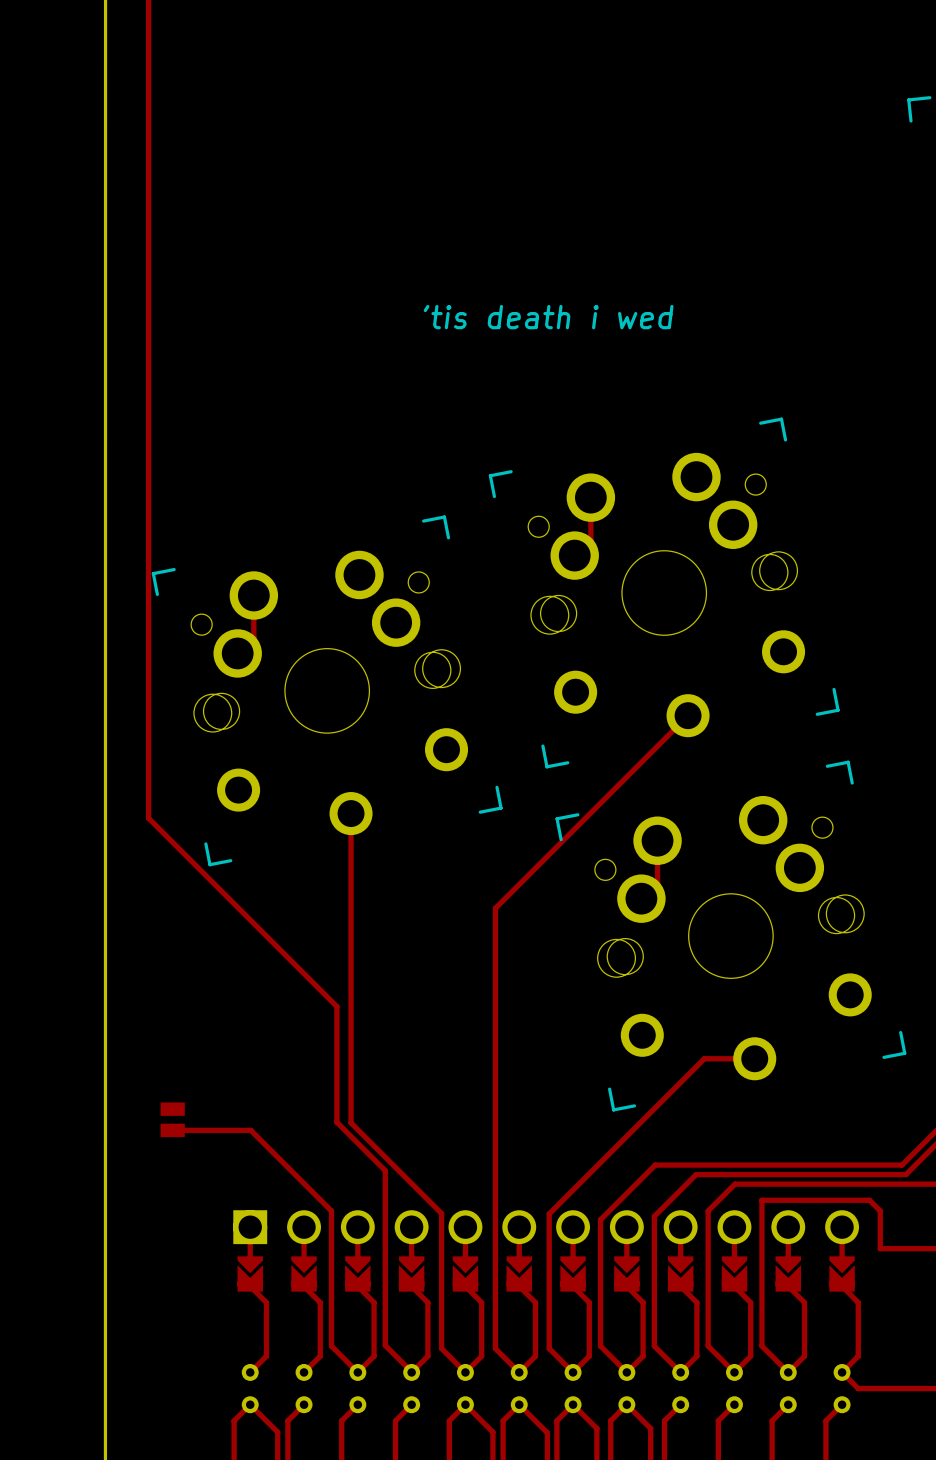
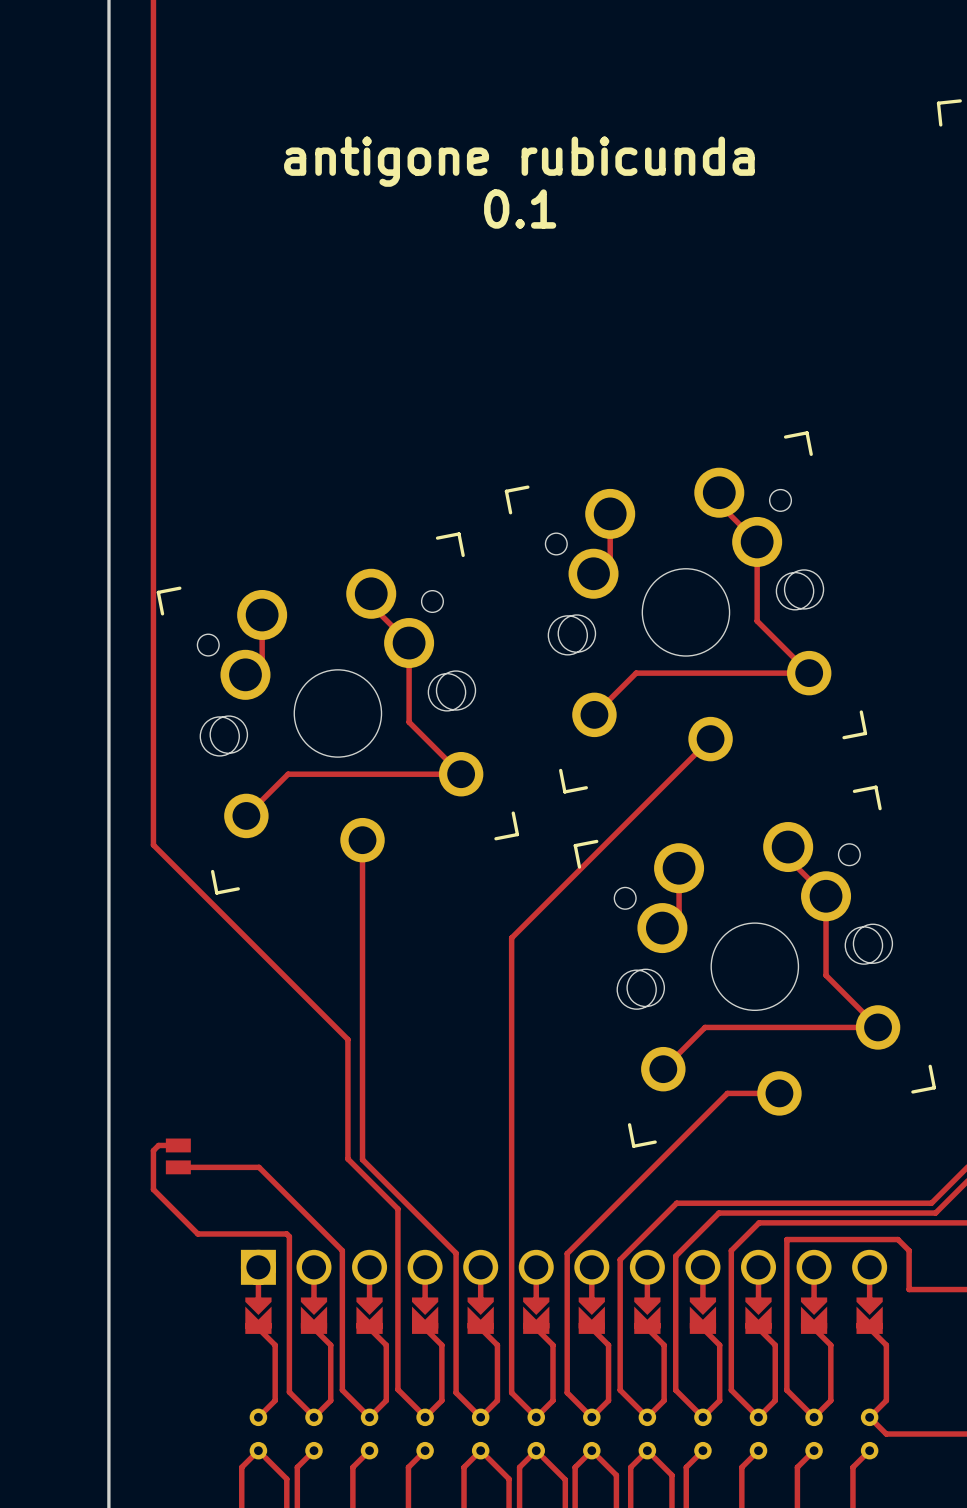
text: none -> antigone rubicunda (519, 161)
text: none -> 0.1 (520, 209)
text: 'tis death i wed (548, 317) -> none
track: none -> (719, 492) (719, 504) (757, 541) (757, 621) (809, 673) (636, 673) (594, 714)
track: none -> (371, 593) (371, 605) (409, 643) (409, 722) (461, 774) (288, 774) (246, 815)
track: none -> (788, 847) (788, 858) (826, 896) (826, 975) (878, 1027) (705, 1027) (663, 1069)
track: none -> (178, 1145) (158, 1145) (153, 1150) (153, 1189) (197, 1233) (286, 1233) (289, 1236) (289, 1392) (313, 1417)

